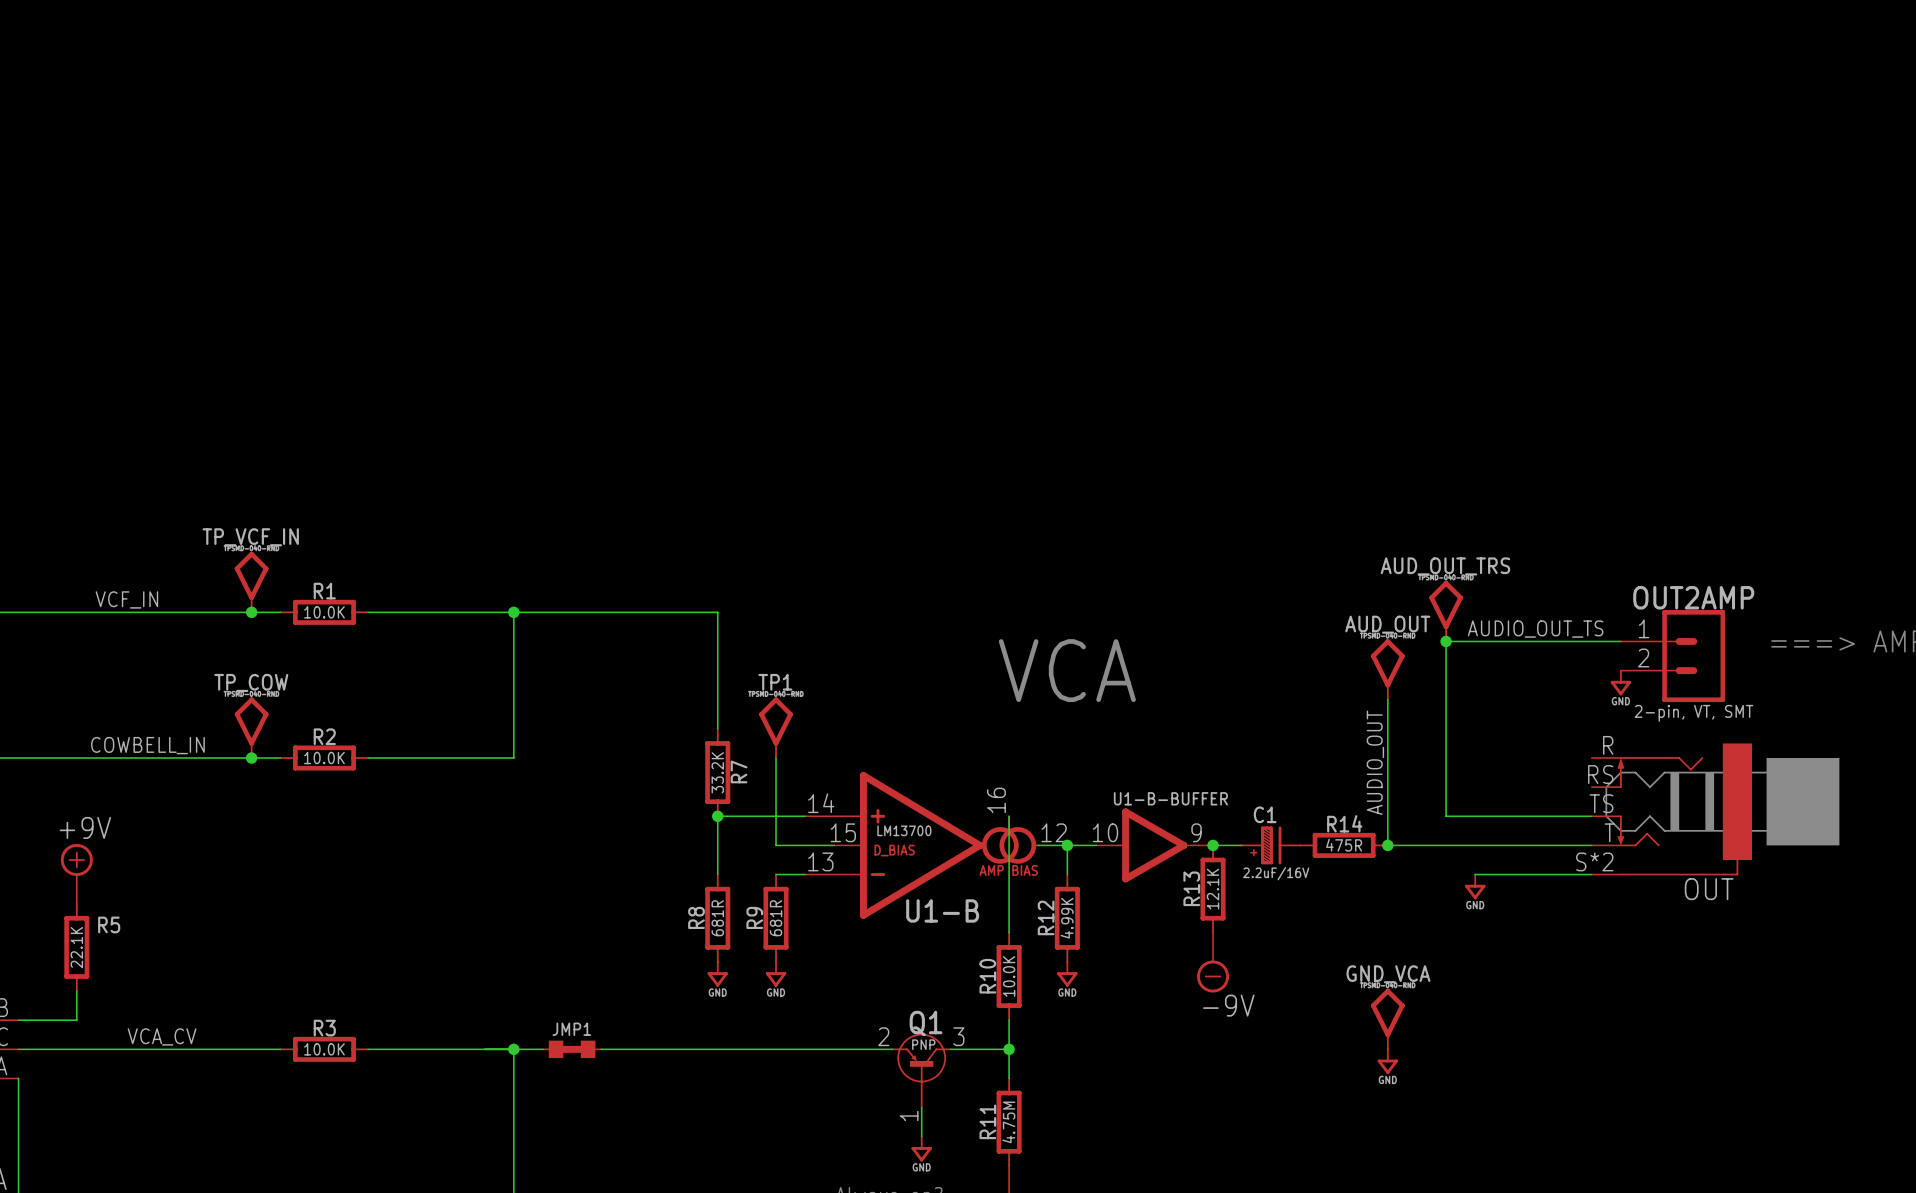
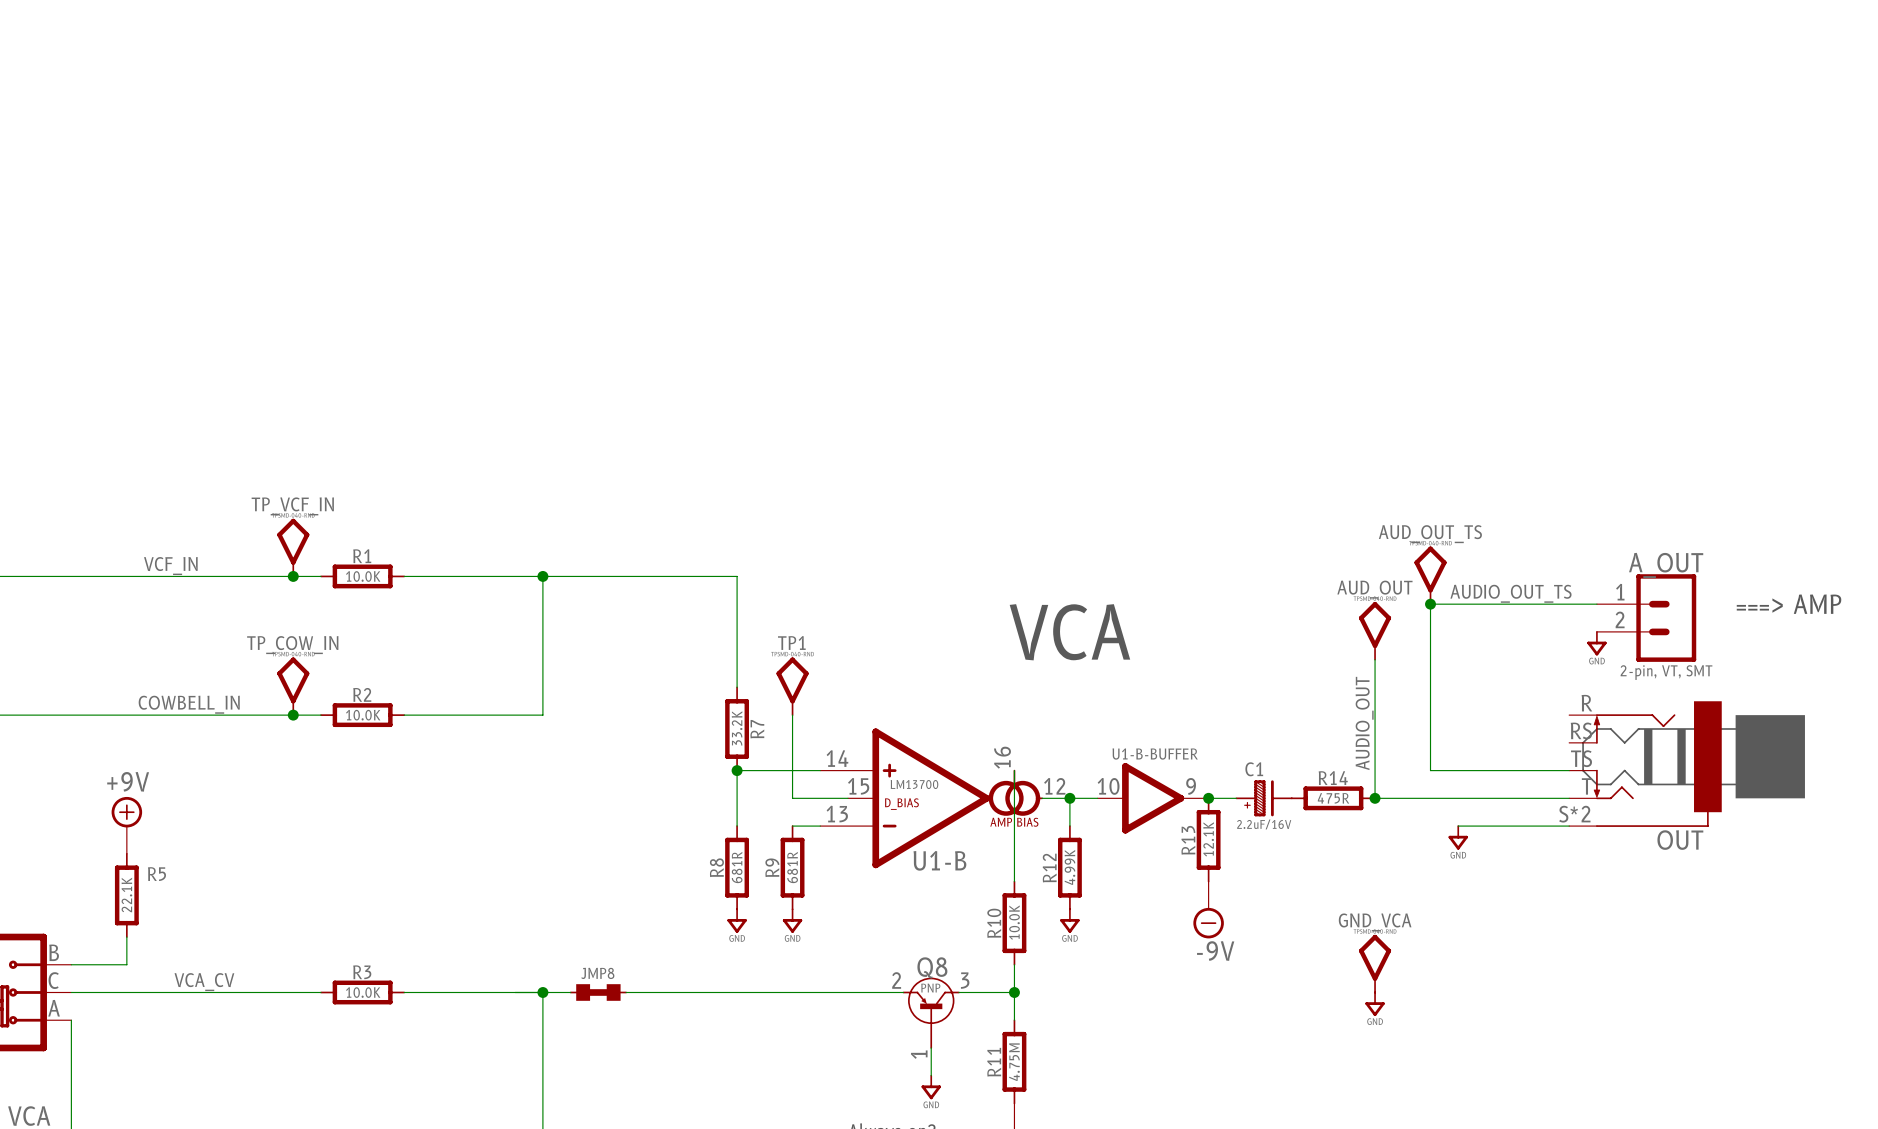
AUD_OUT_TRS name: AUD_OUT_TRS (1445, 566) -> AUD_OUT_TS (1430, 534)
OUT2AMP name: OUT2AMP (1693, 597) -> A_OUT (1666, 565)
TP_COW name: TP_COW (251, 682) -> TP_COW_IN (292, 645)
Q1 name: Q1 (926, 1023) -> Q8 (932, 967)
JMP1 name: JMP1 (571, 1029) -> JMP8 (597, 973)

